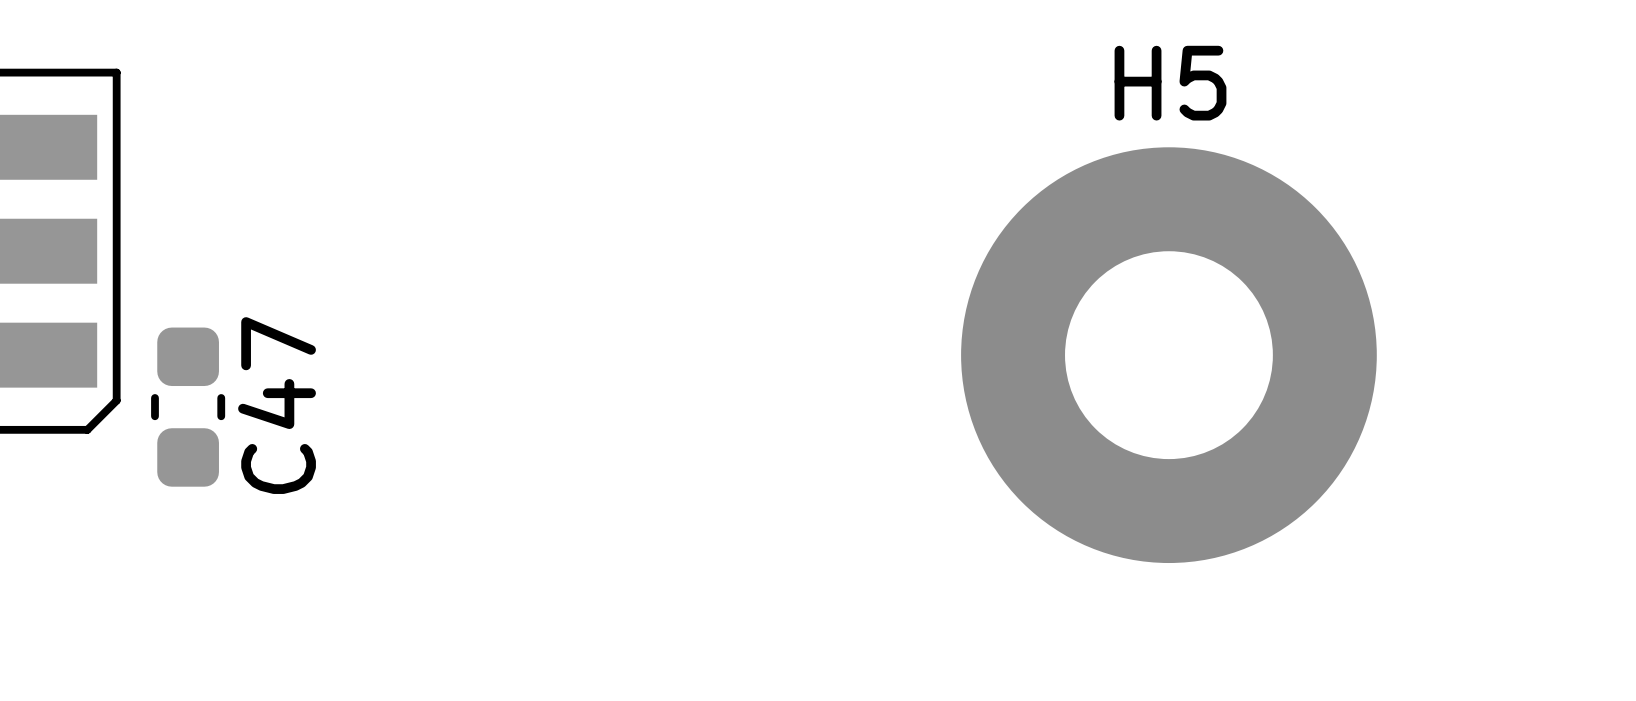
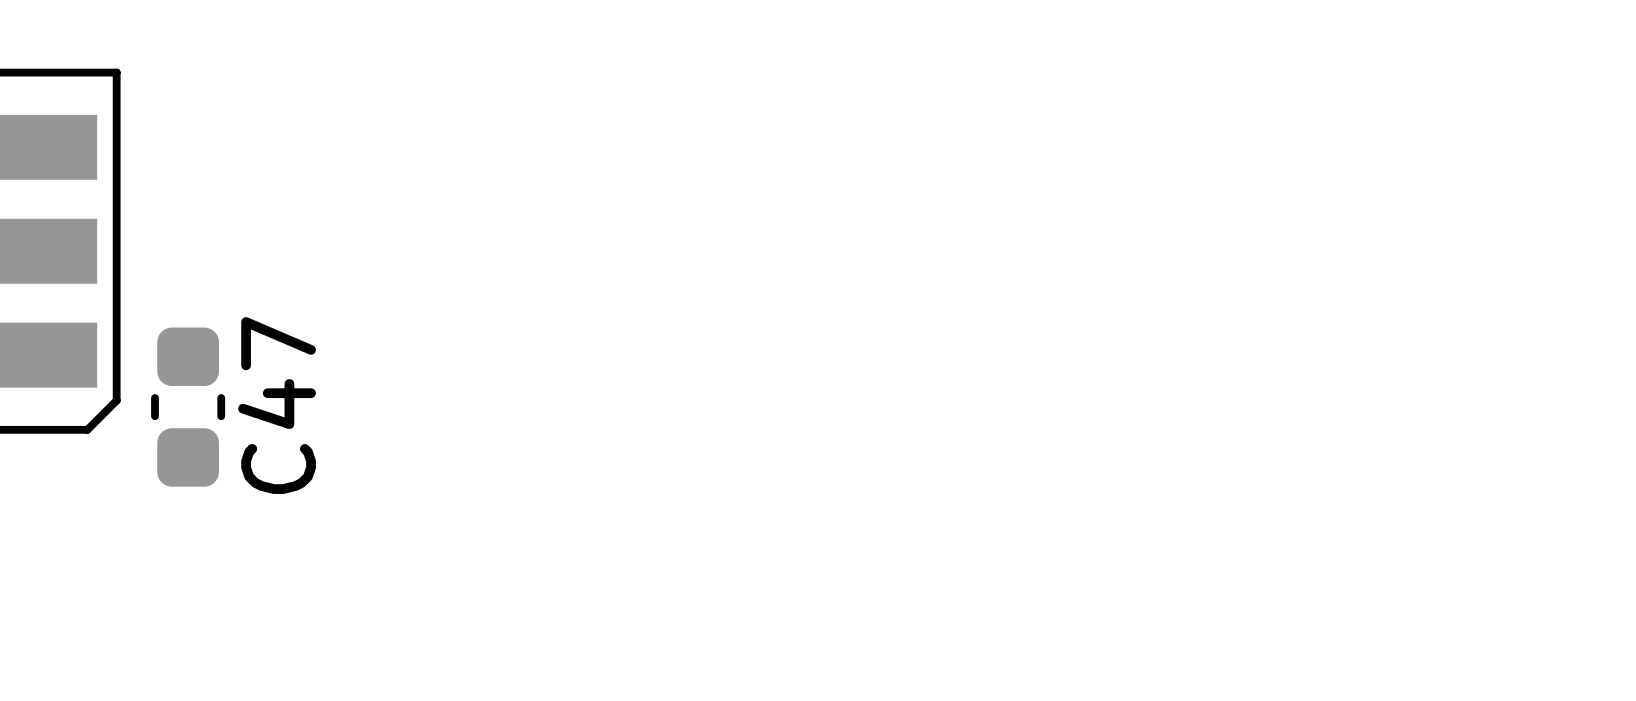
H5: (1168, 355) -> none

